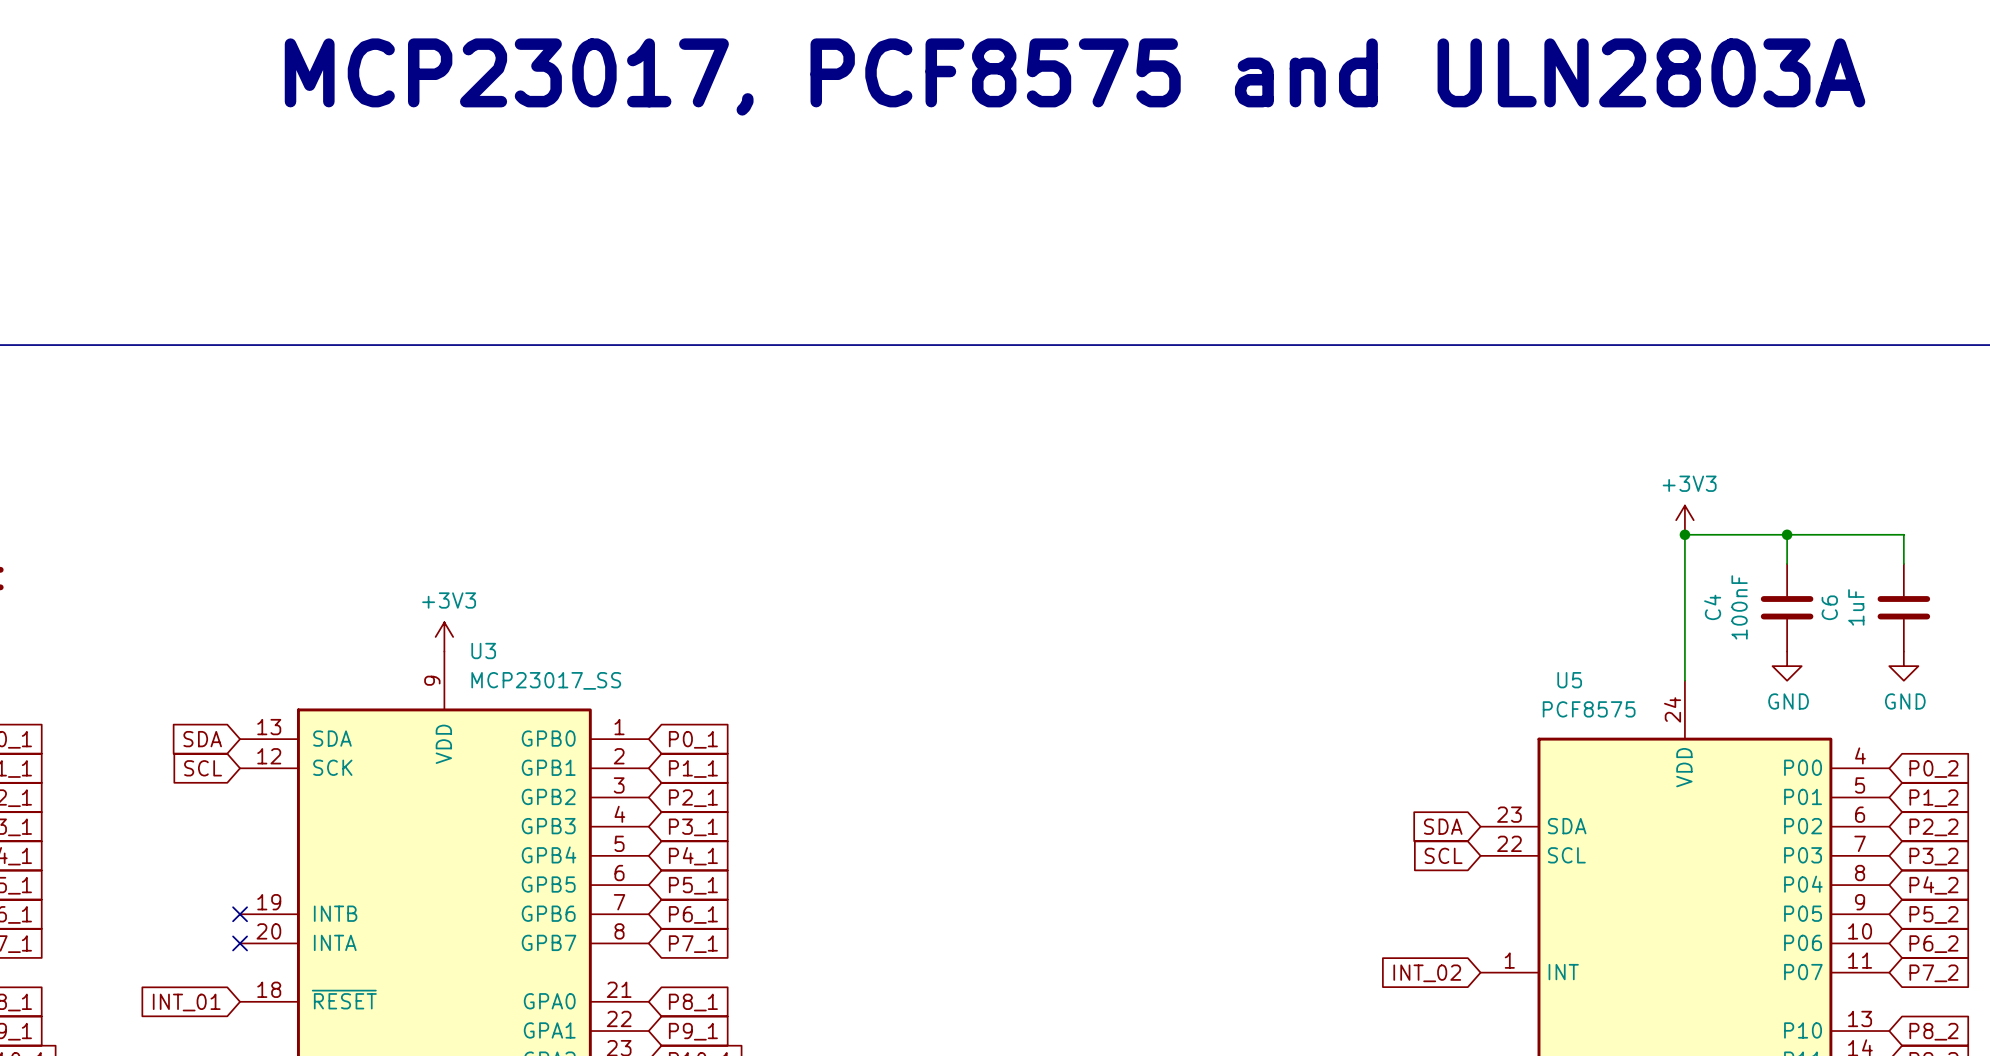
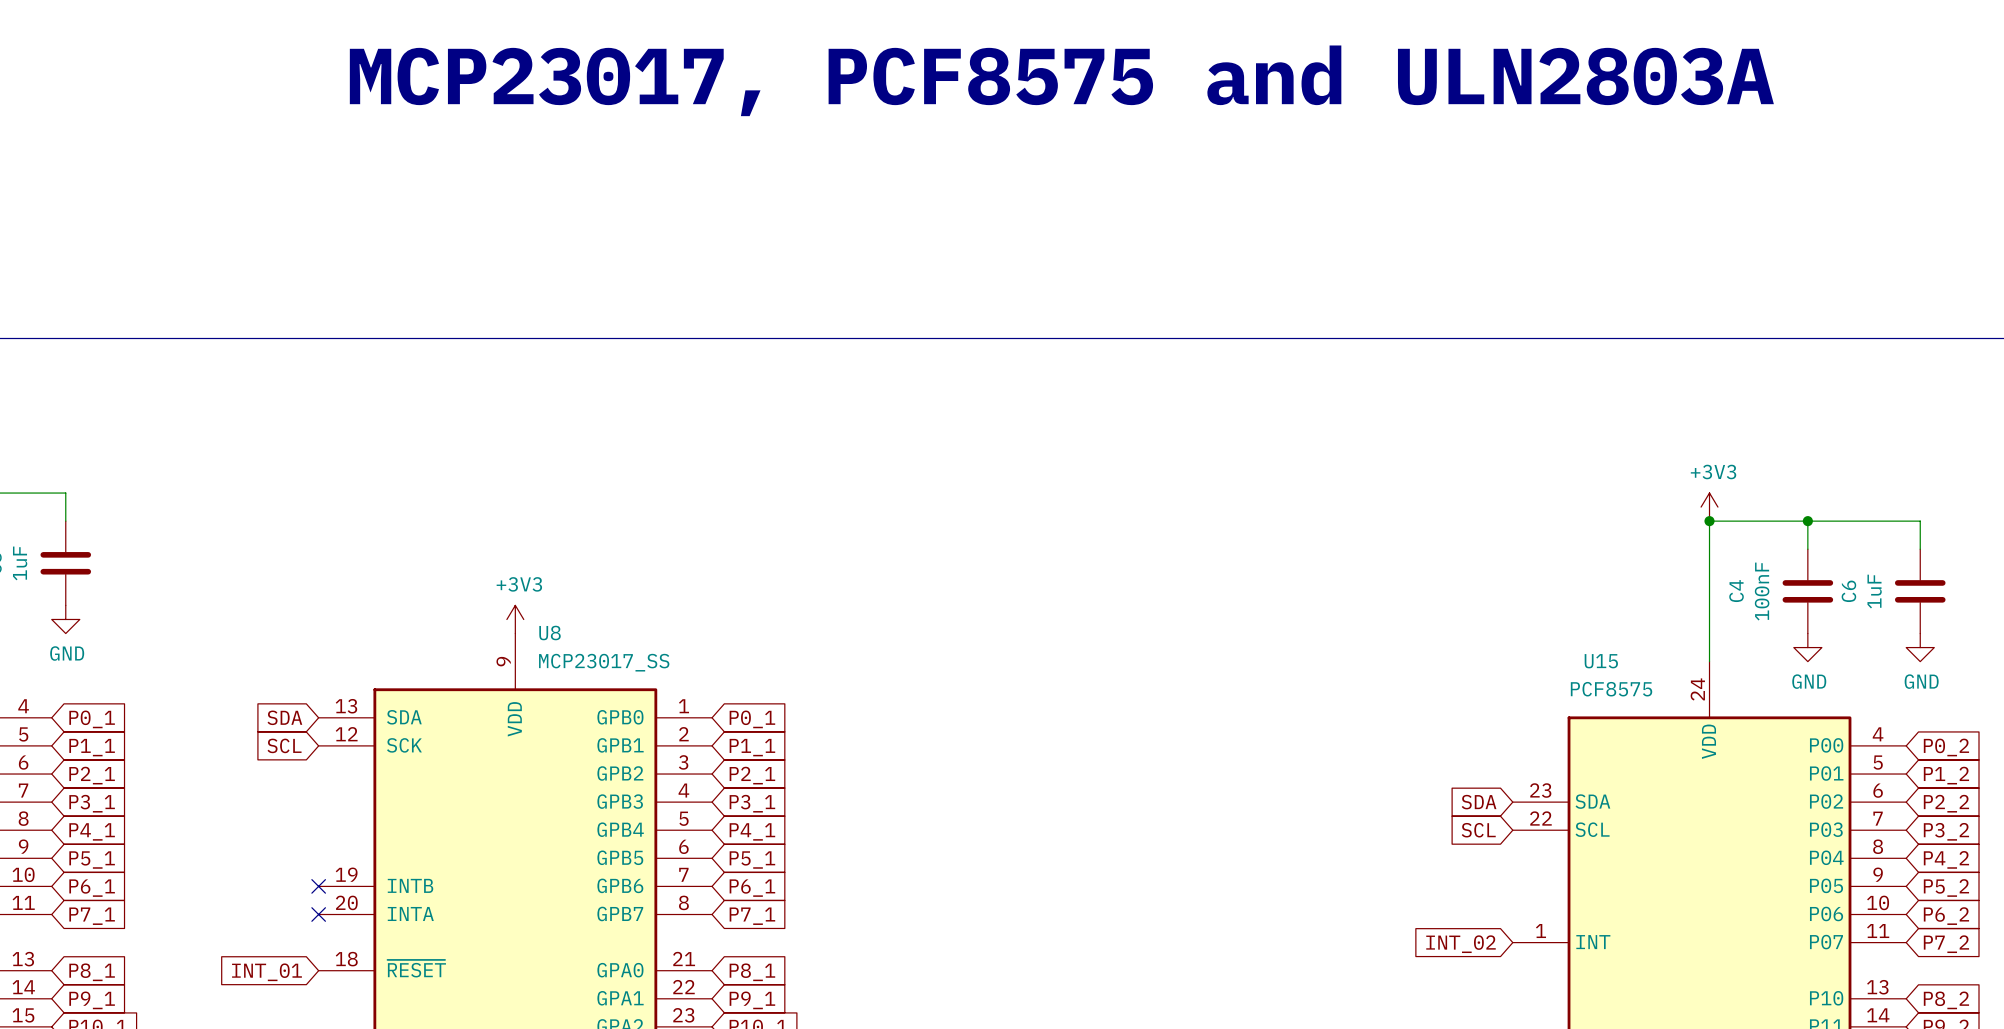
U3 name: U3 (483, 651) -> U8 (550, 633)
U5 name: U5 (1569, 680) -> U15 (1601, 661)

